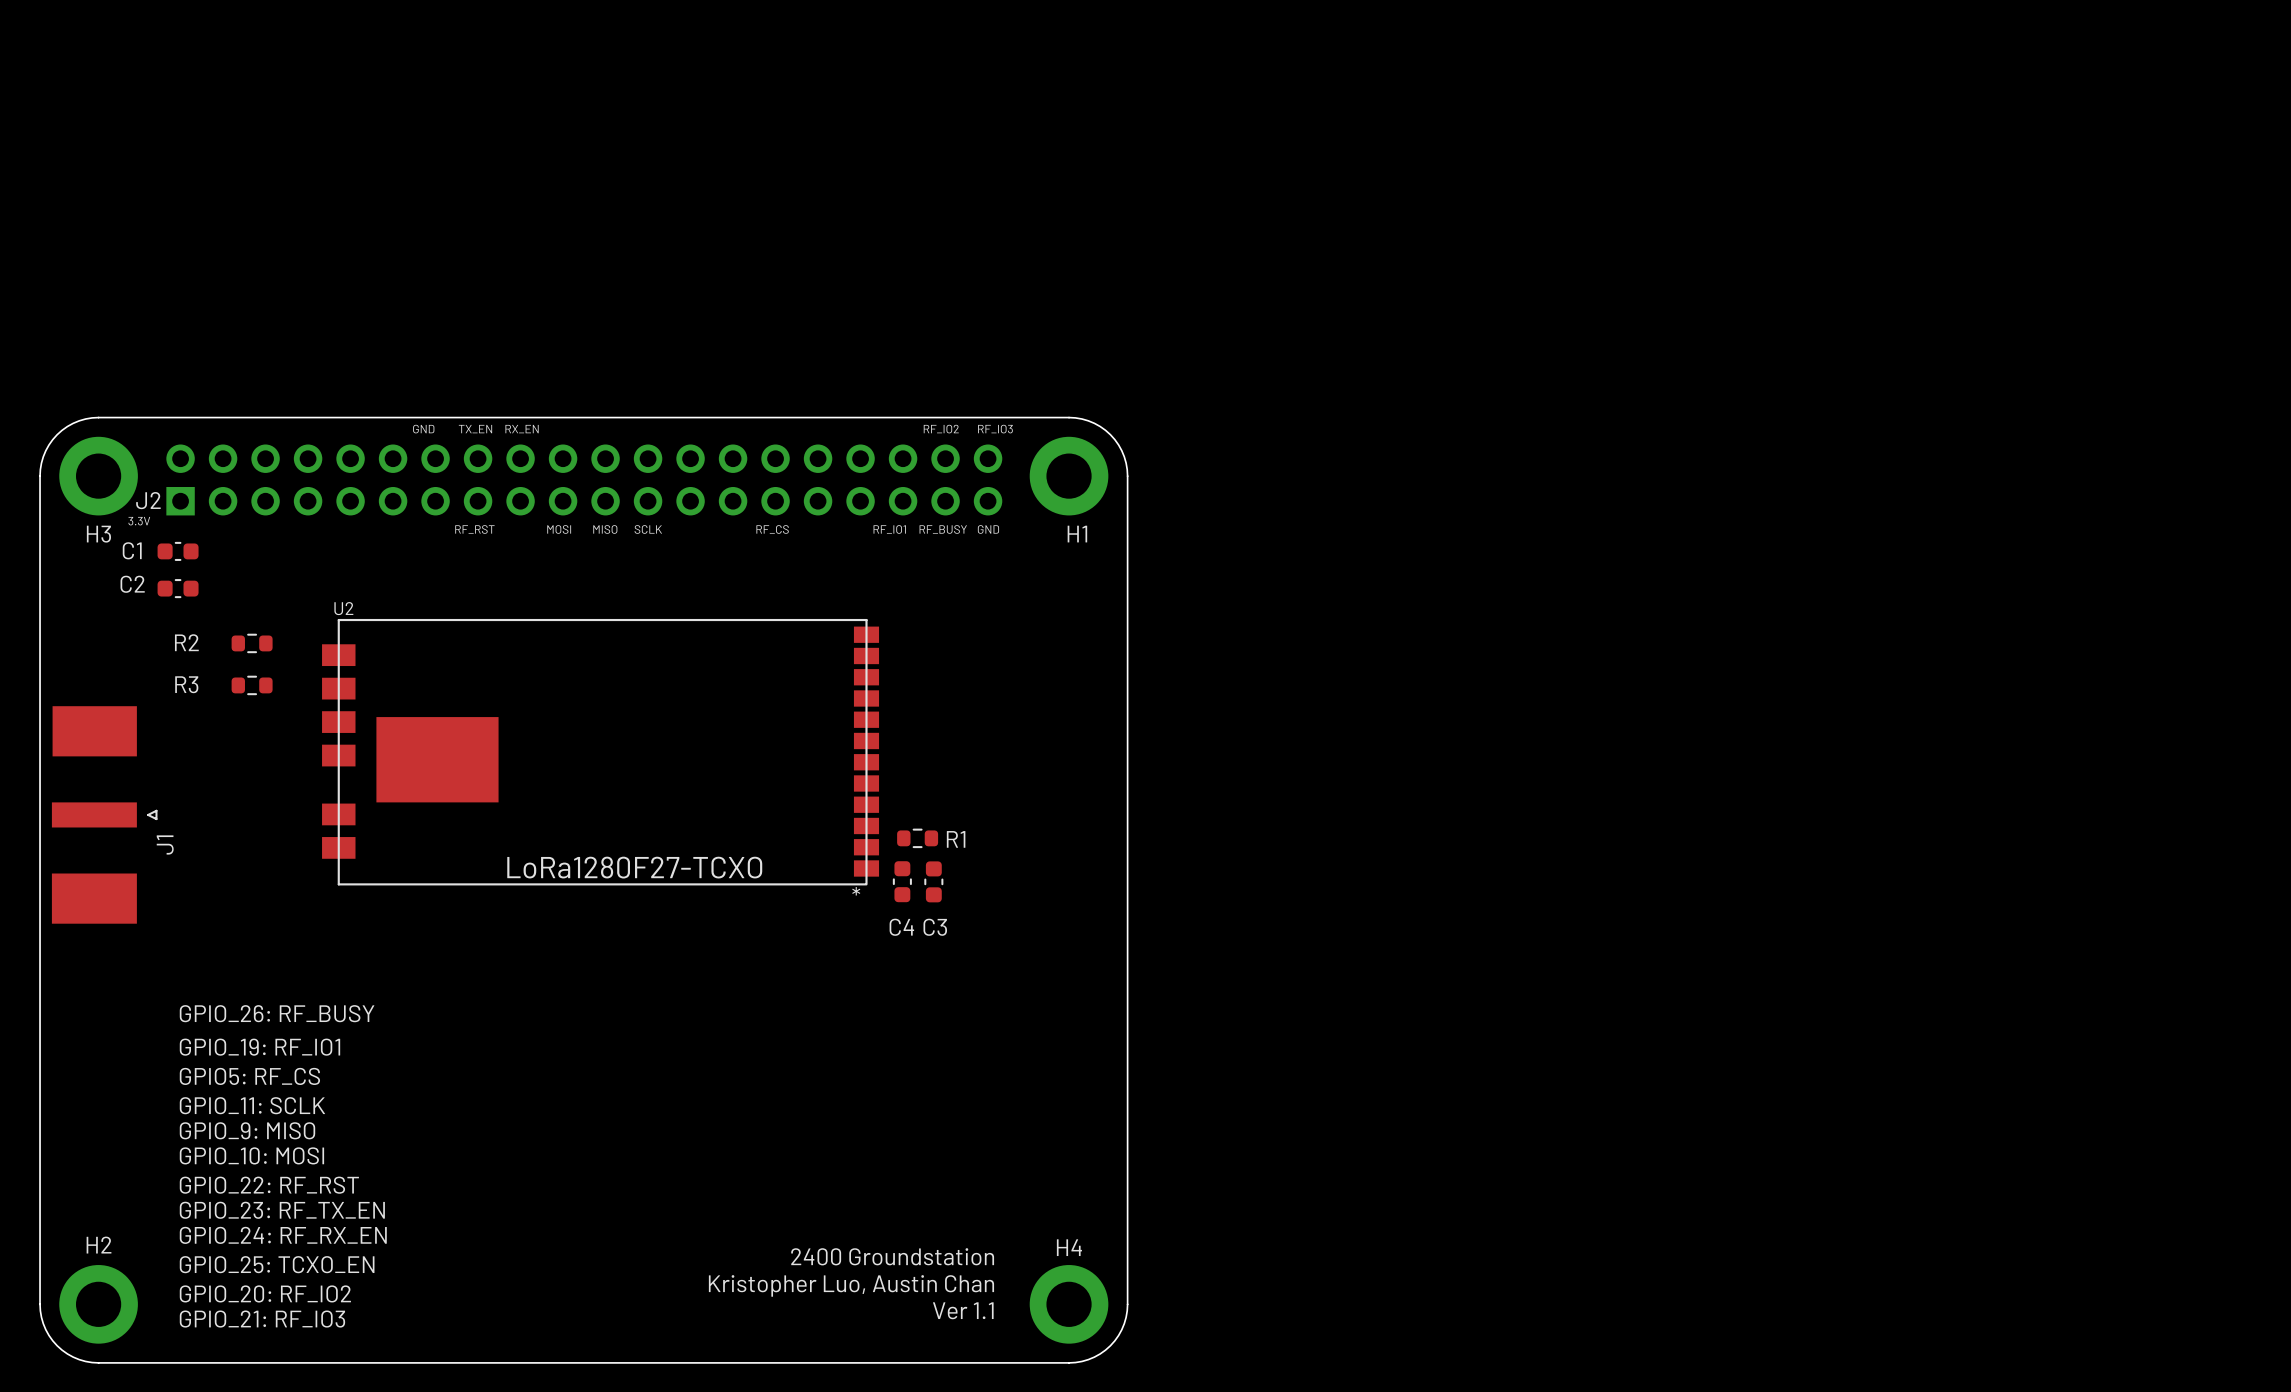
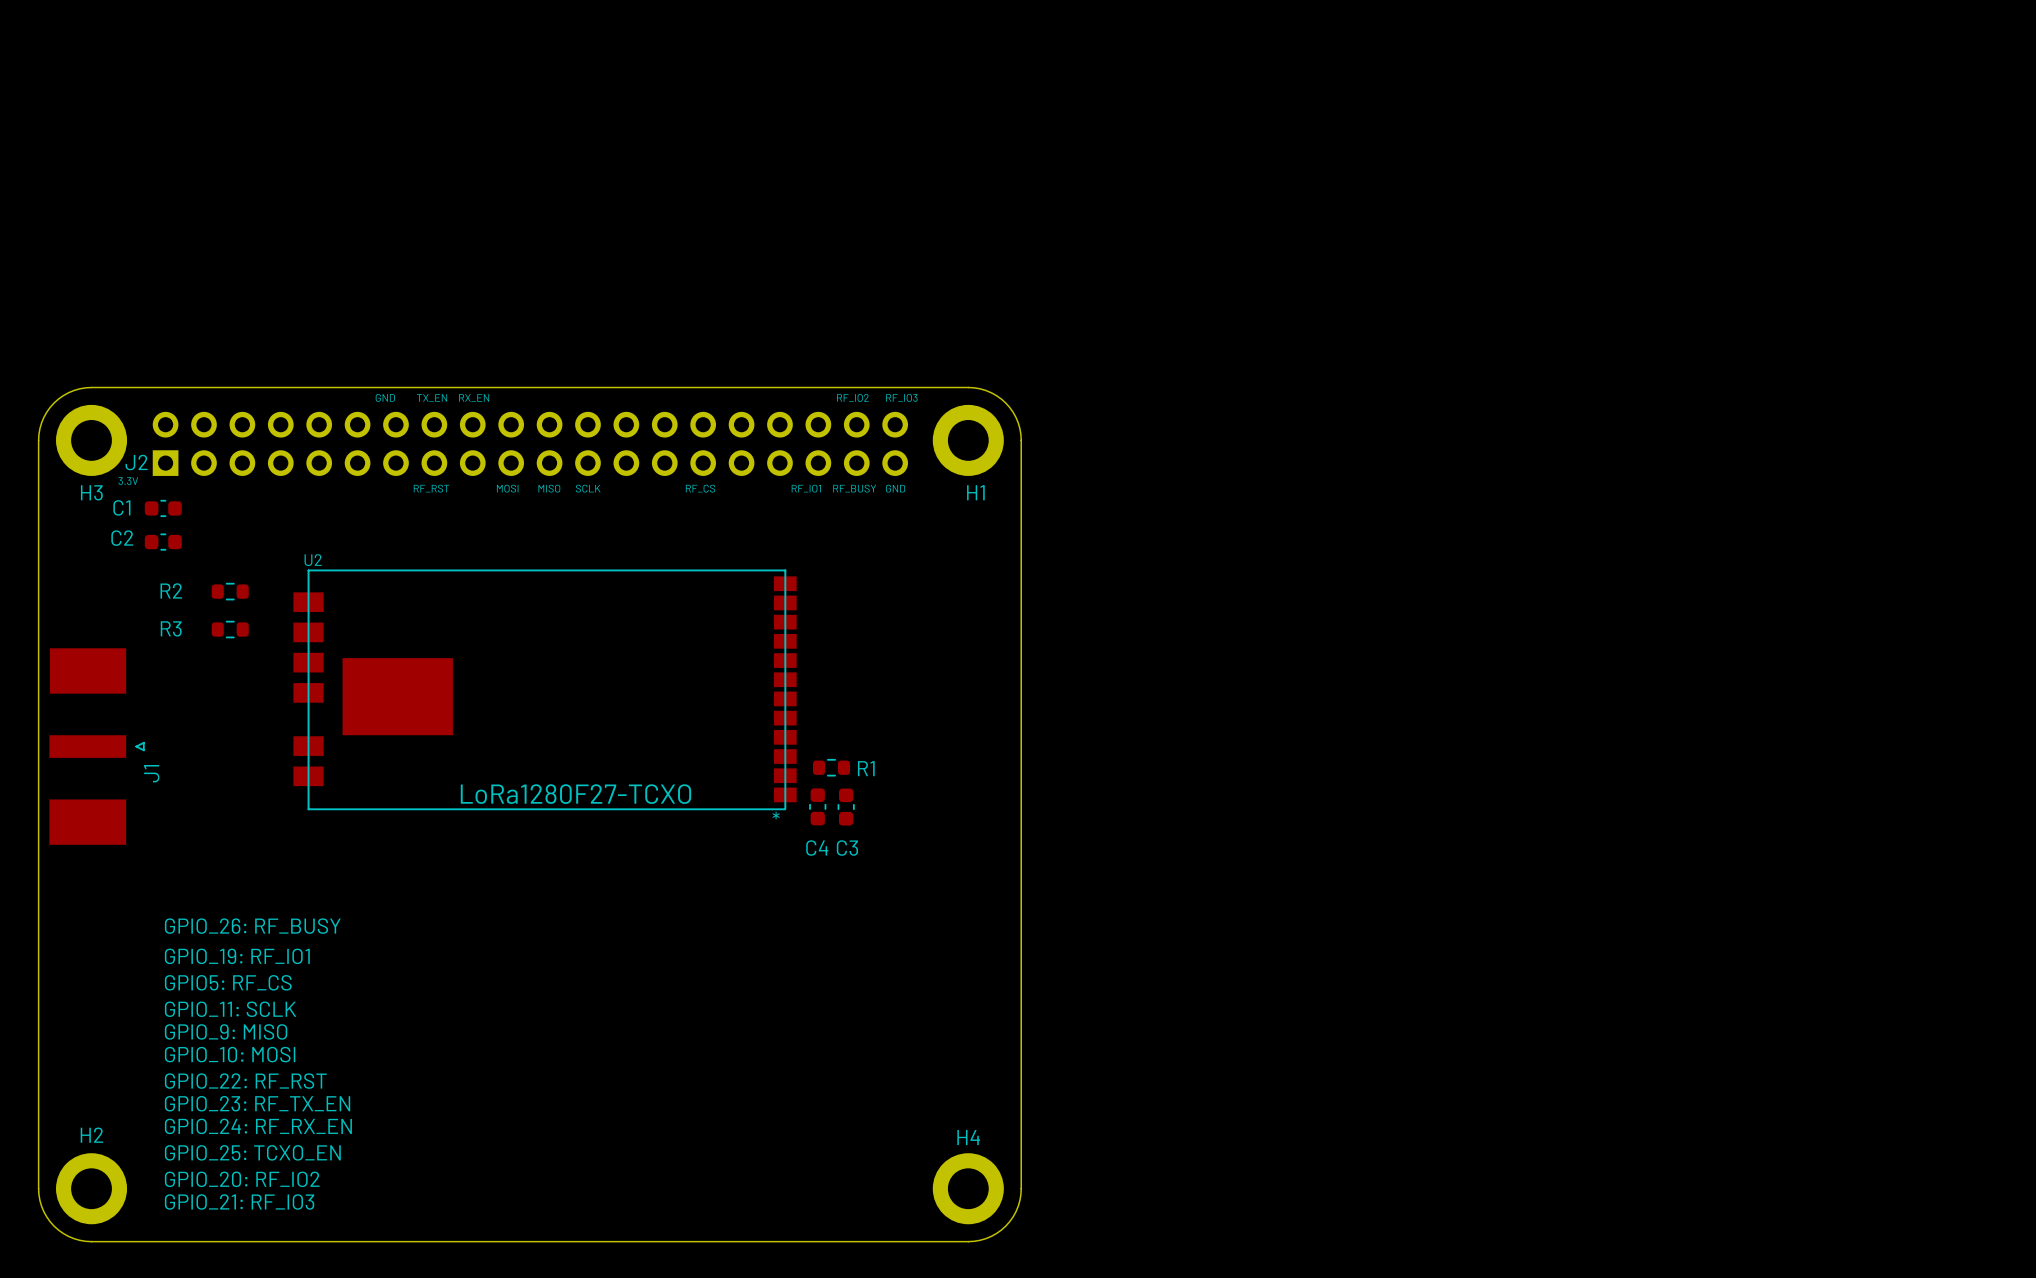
text: 2400 Groundstation (892, 1256) -> none
text: Kristopher Luo, Austin Chan (851, 1285) -> none
text: Ver 1.1 (963, 1310) -> none

